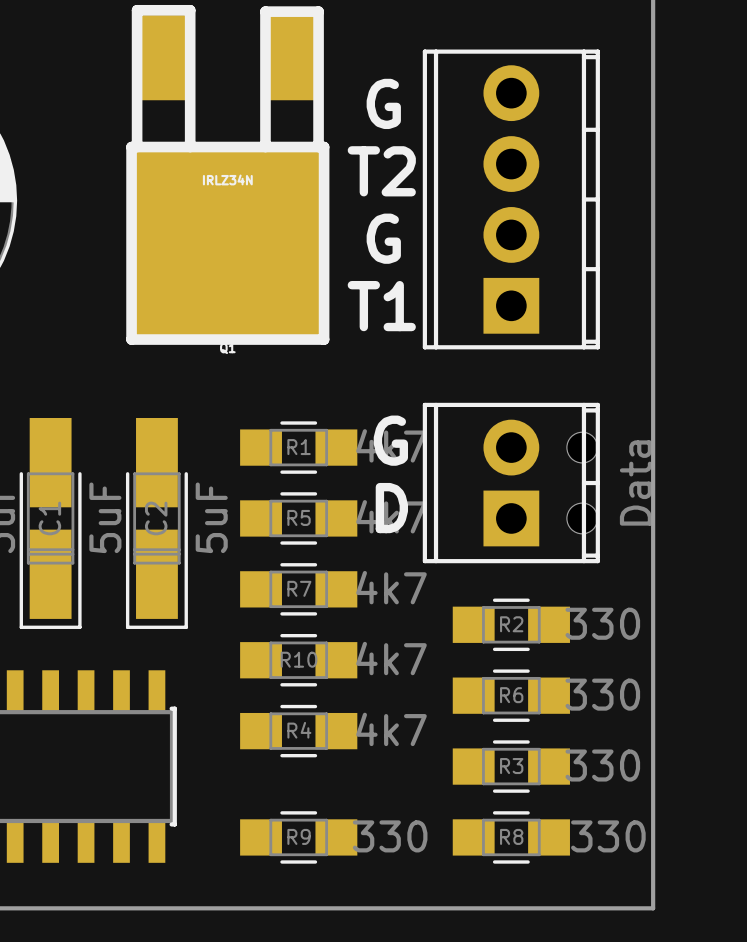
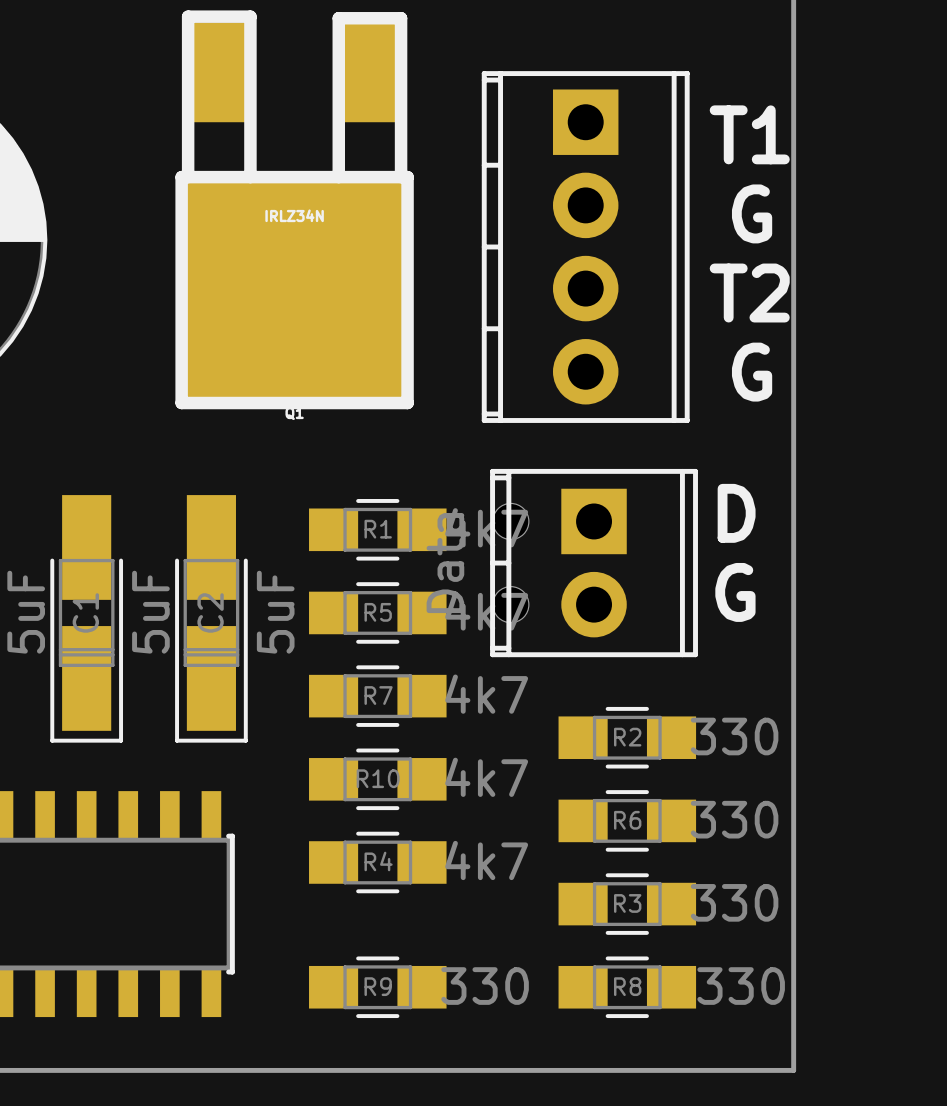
text: G (383, 103) -> none
text position: T2 (381, 171) -> T2 (749, 293)
text: none -> G (752, 213)
part rotation: 0° (511, 199) -> 180° (585, 246)
text: G (383, 238) -> none
text position: T1 (381, 306) -> T1 (749, 134)
text: none -> G (752, 372)
text: G (390, 440) -> none
part rotation: 0° (511, 483) -> 180° (594, 563)
text: none -> G (735, 592)
text position: D (391, 508) -> D (736, 513)

